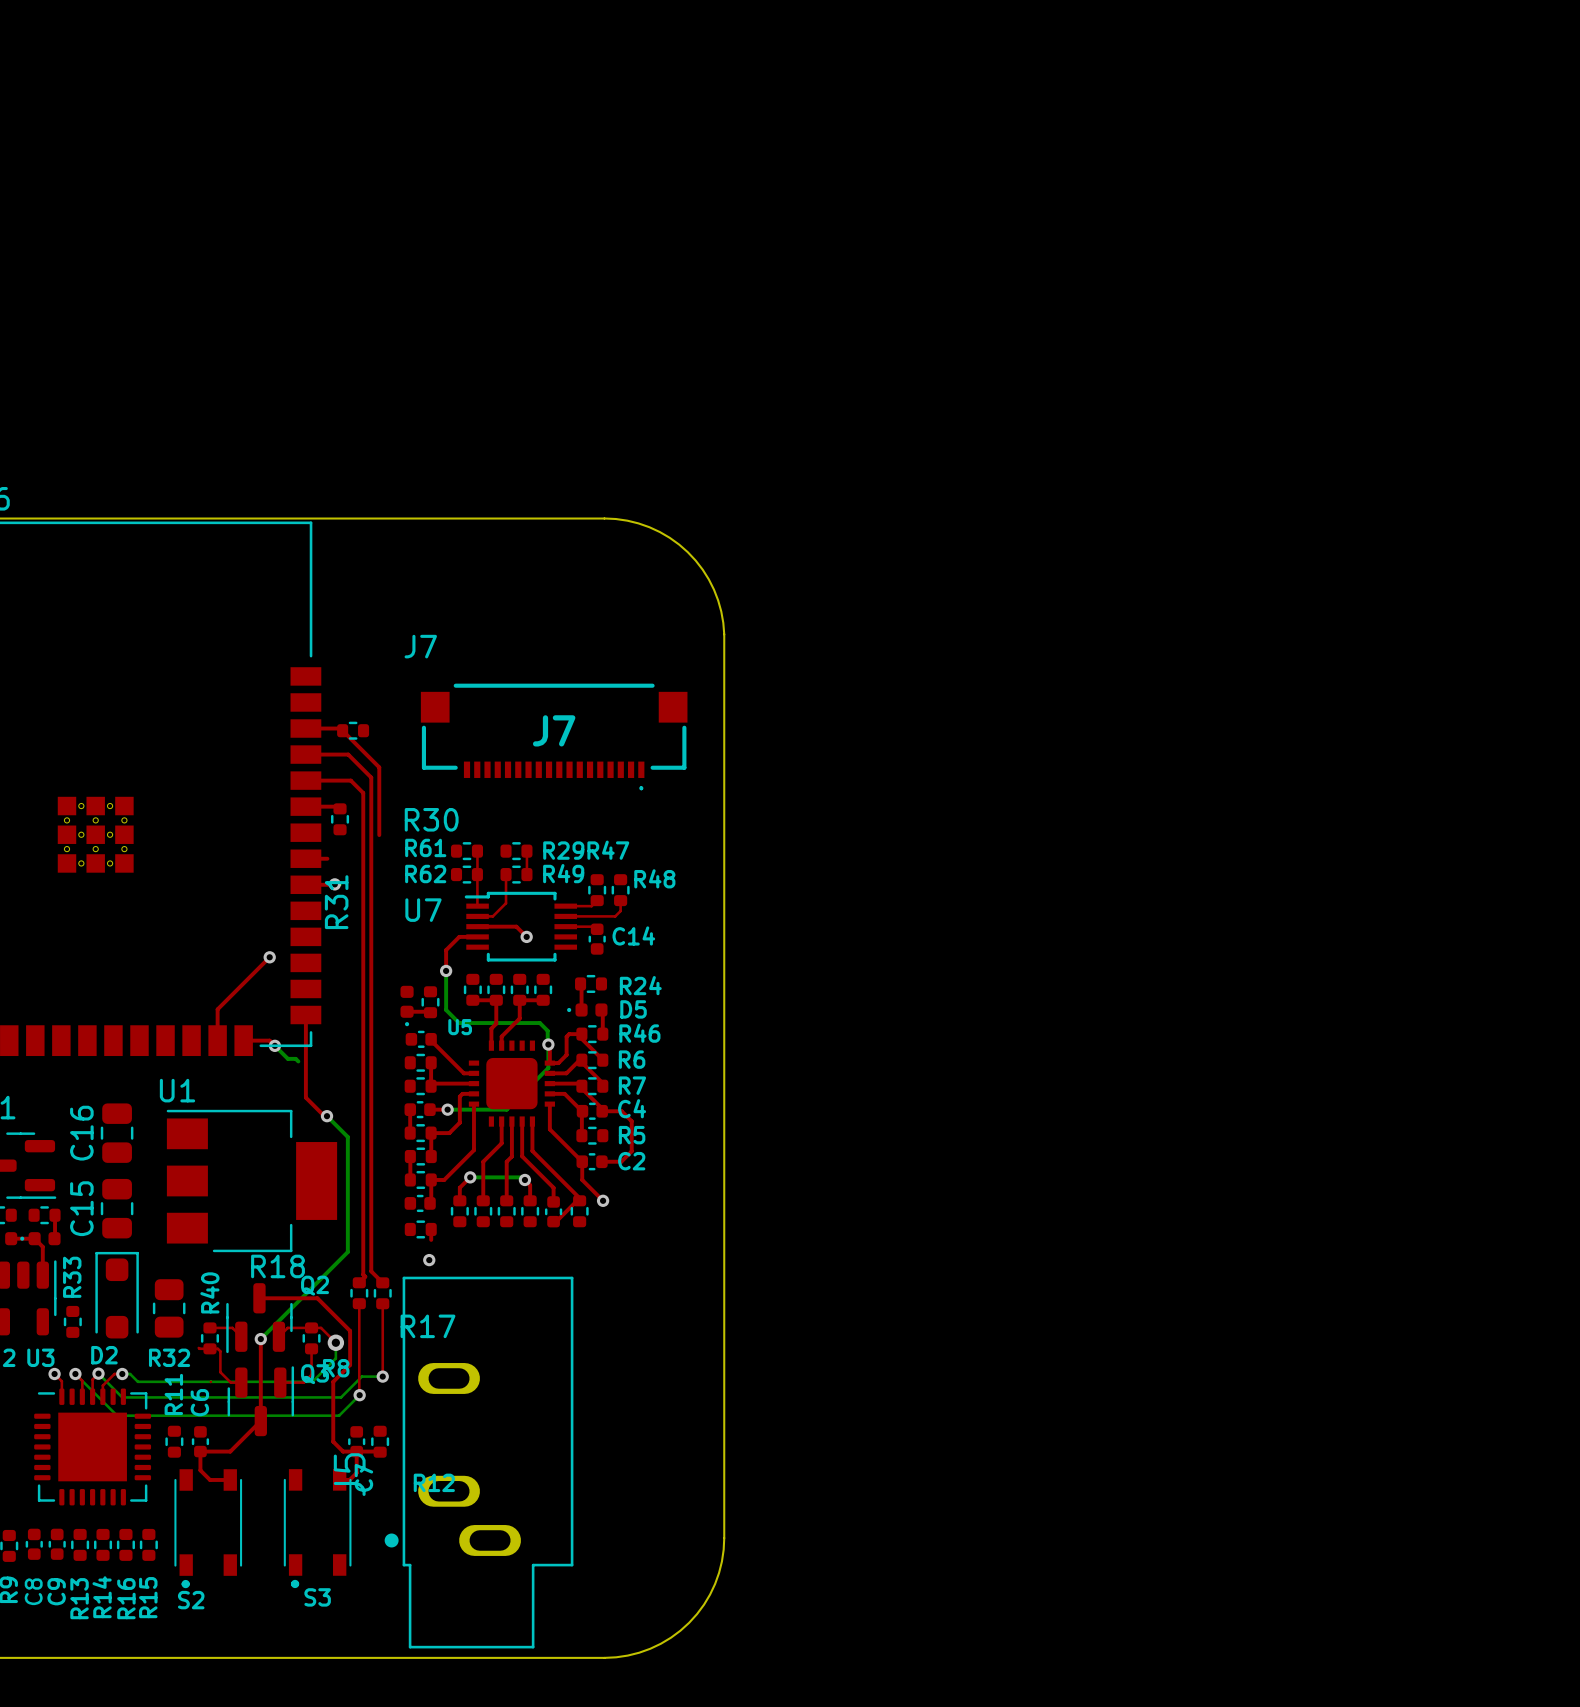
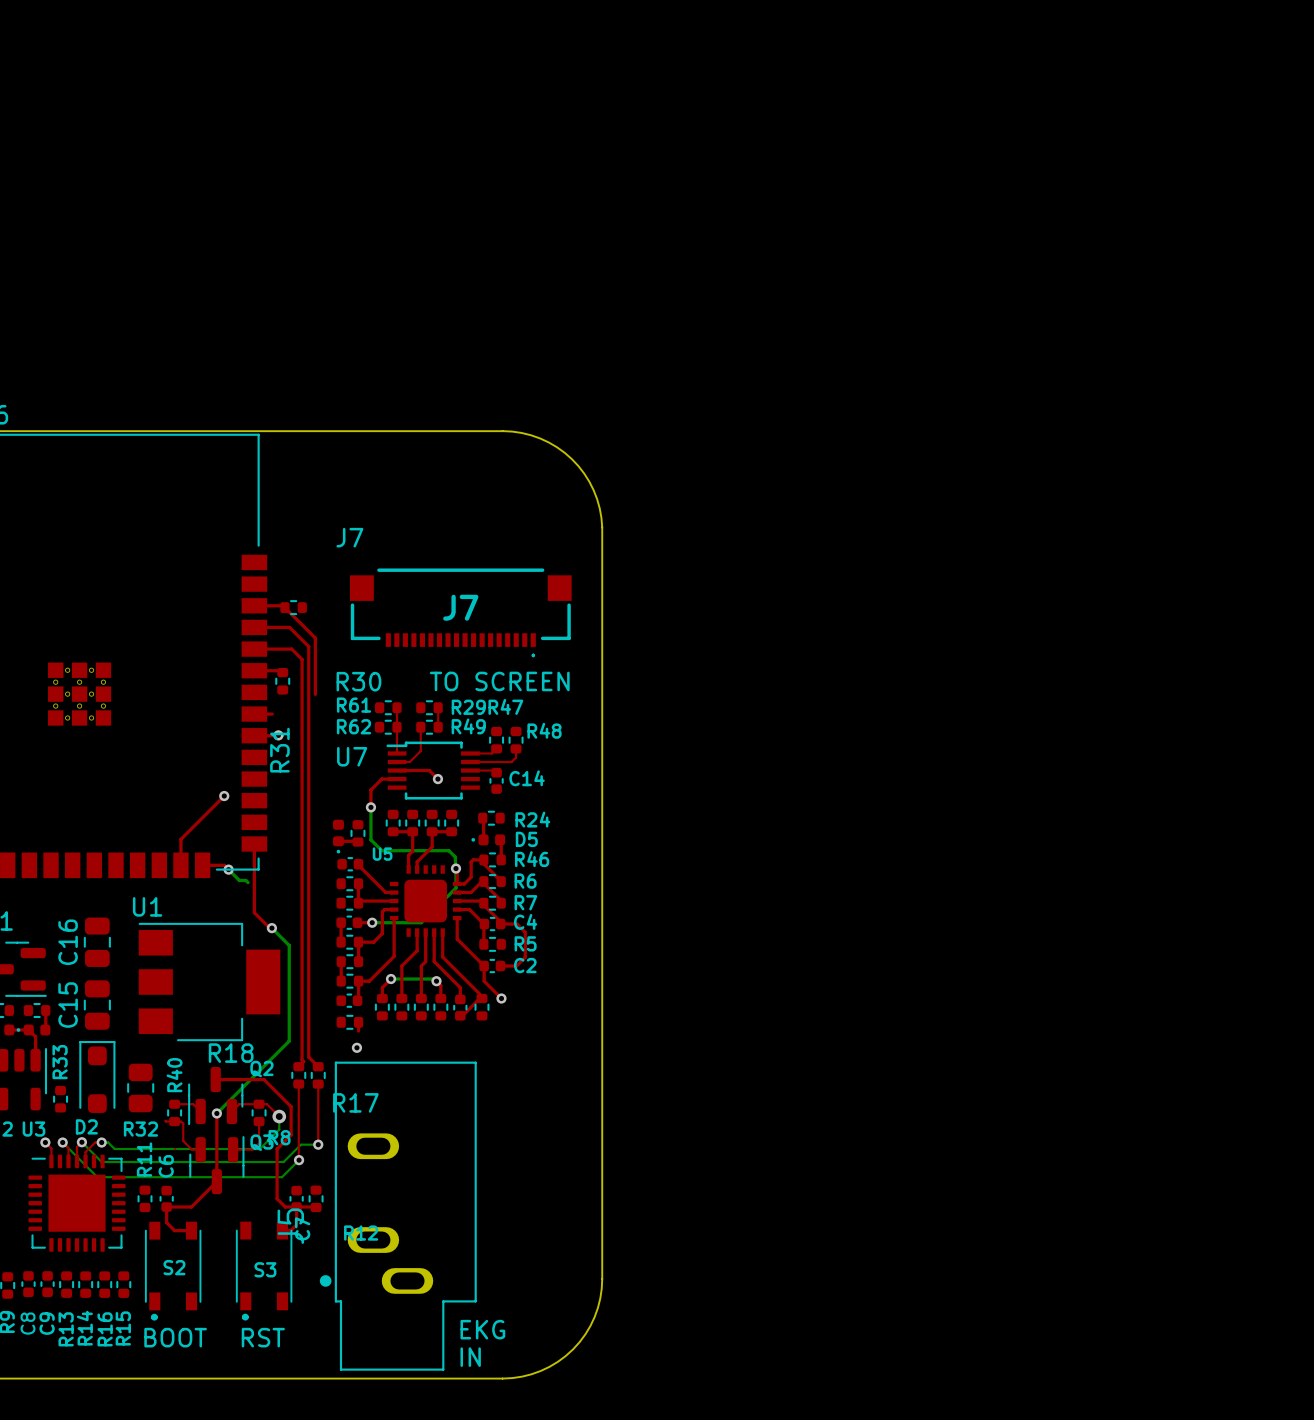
text: none -> TO SCREEN (499, 681)
S3 name position: S3 (317, 1597) -> S3 (265, 1269)
text: none -> EKG (482, 1329)
S2 name position: S2 (191, 1600) -> S2 (174, 1267)
text: none -> BOOT (175, 1337)
text: none -> RST (263, 1337)
text: none -> IN (470, 1357)

